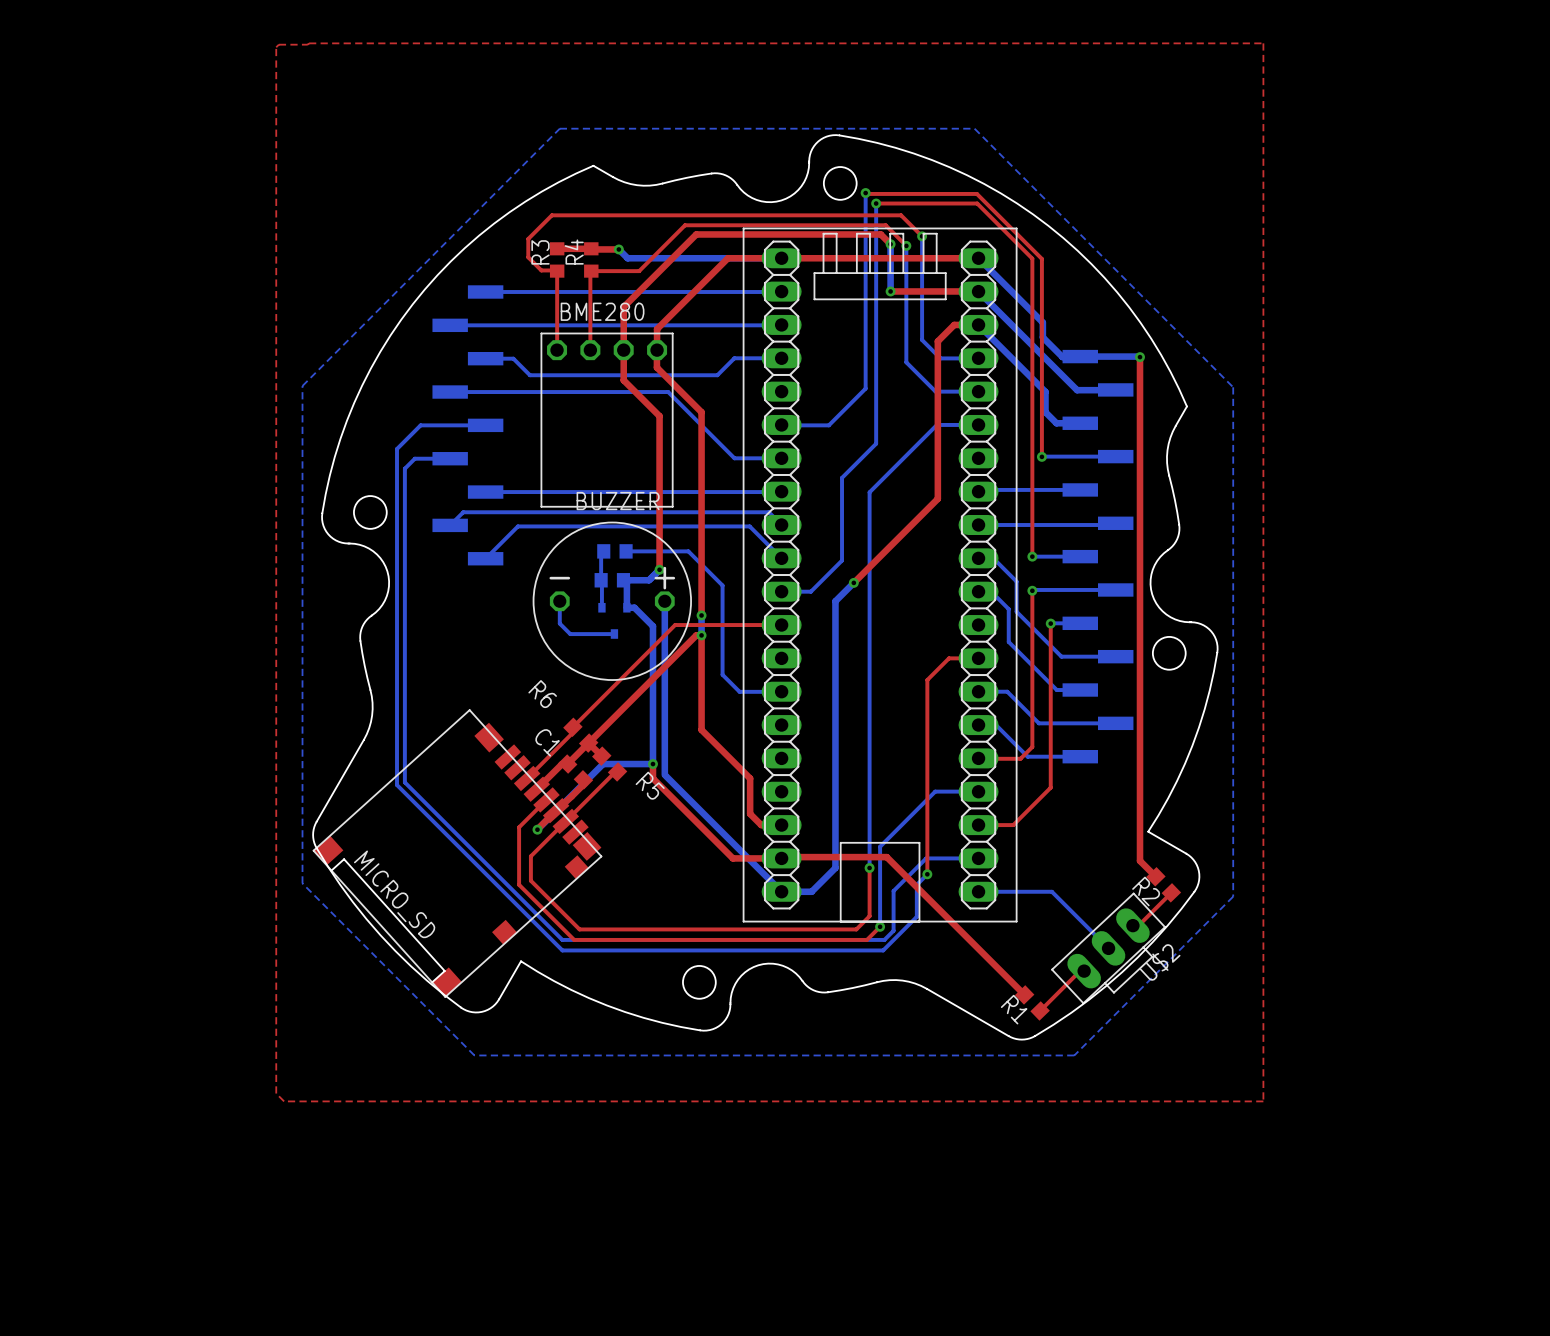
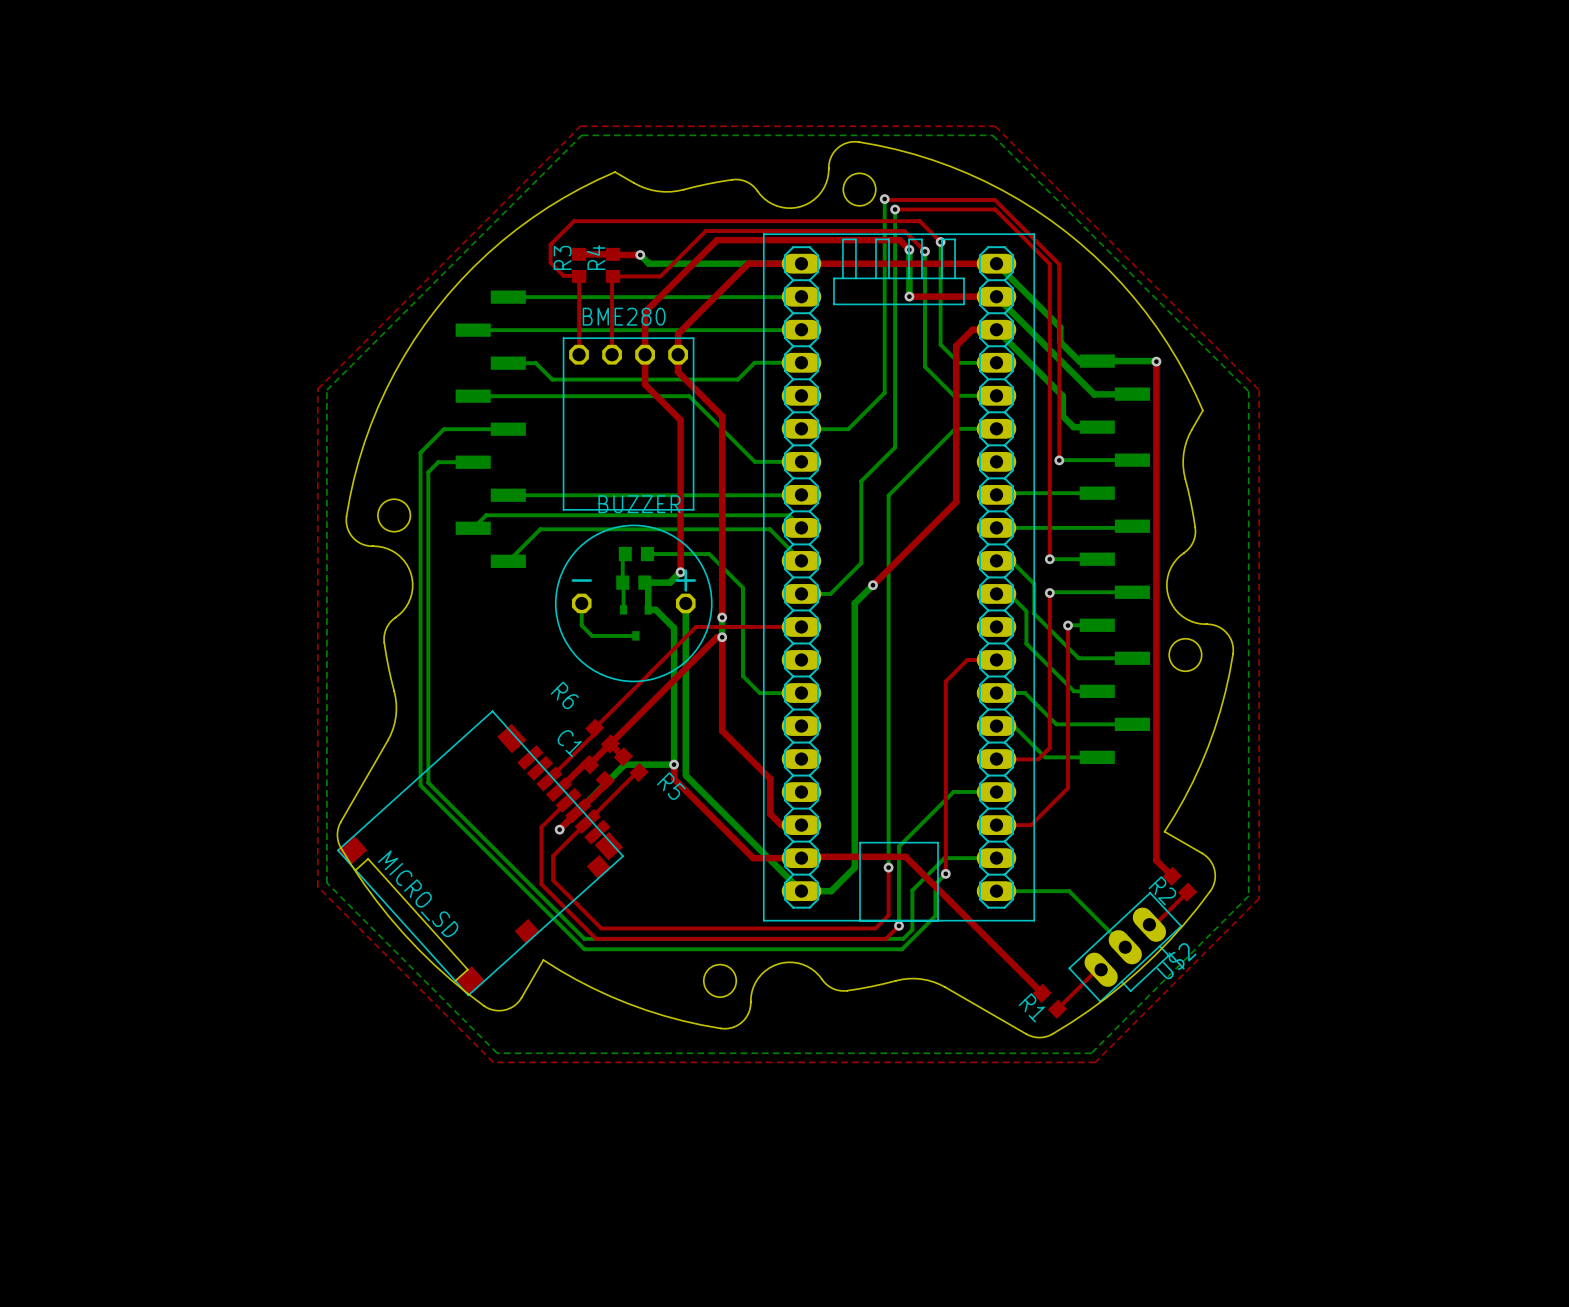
top zone outline: (309, 43) (1263, 43) (1263, 1101) (284, 1101) (276, 1093) (276, 47) (278, 44) (309, 43) -> (580, 126) (317, 388) (317, 886) (493, 1062) (1095, 1062) (1259, 898) (1259, 390) (995, 126) (580, 126)

